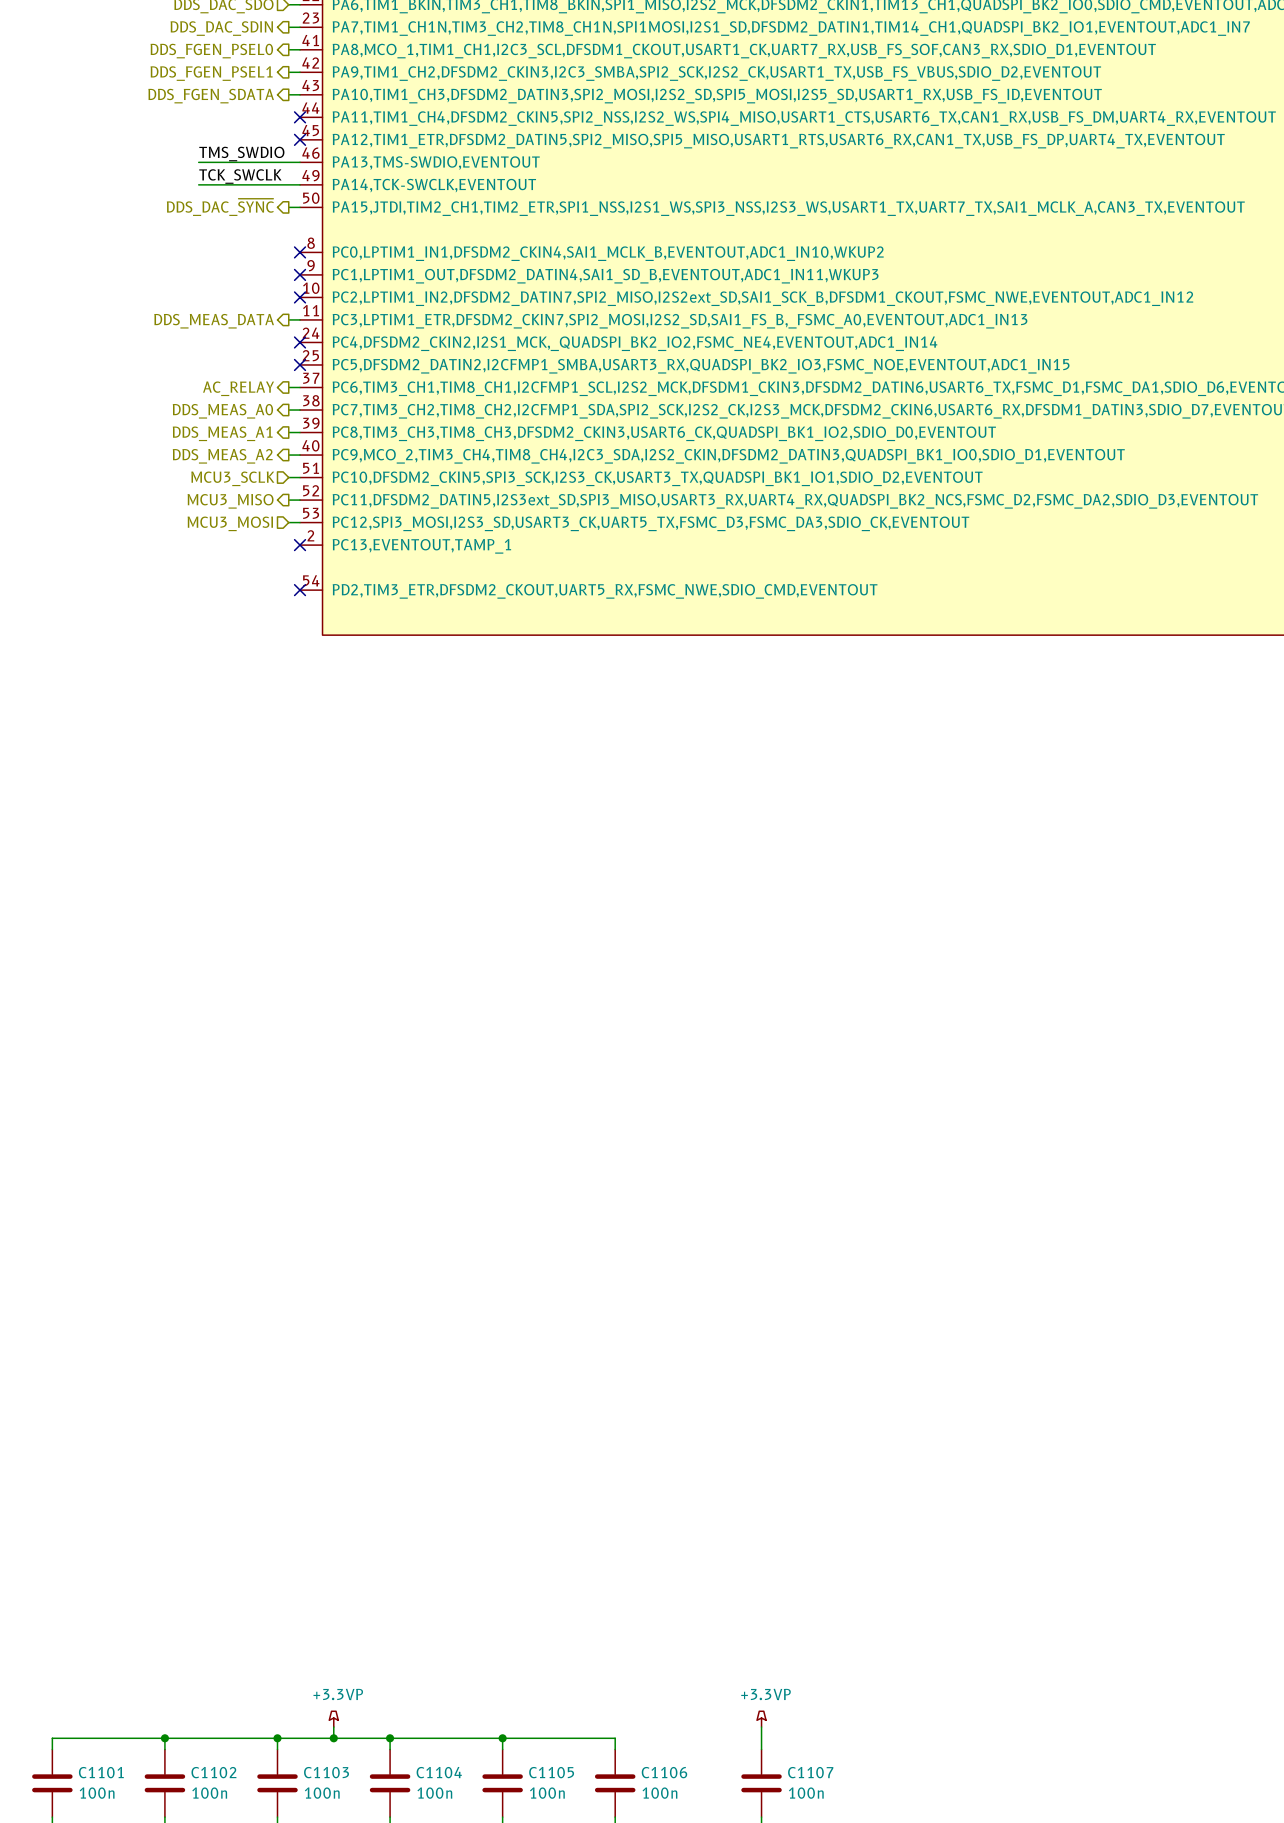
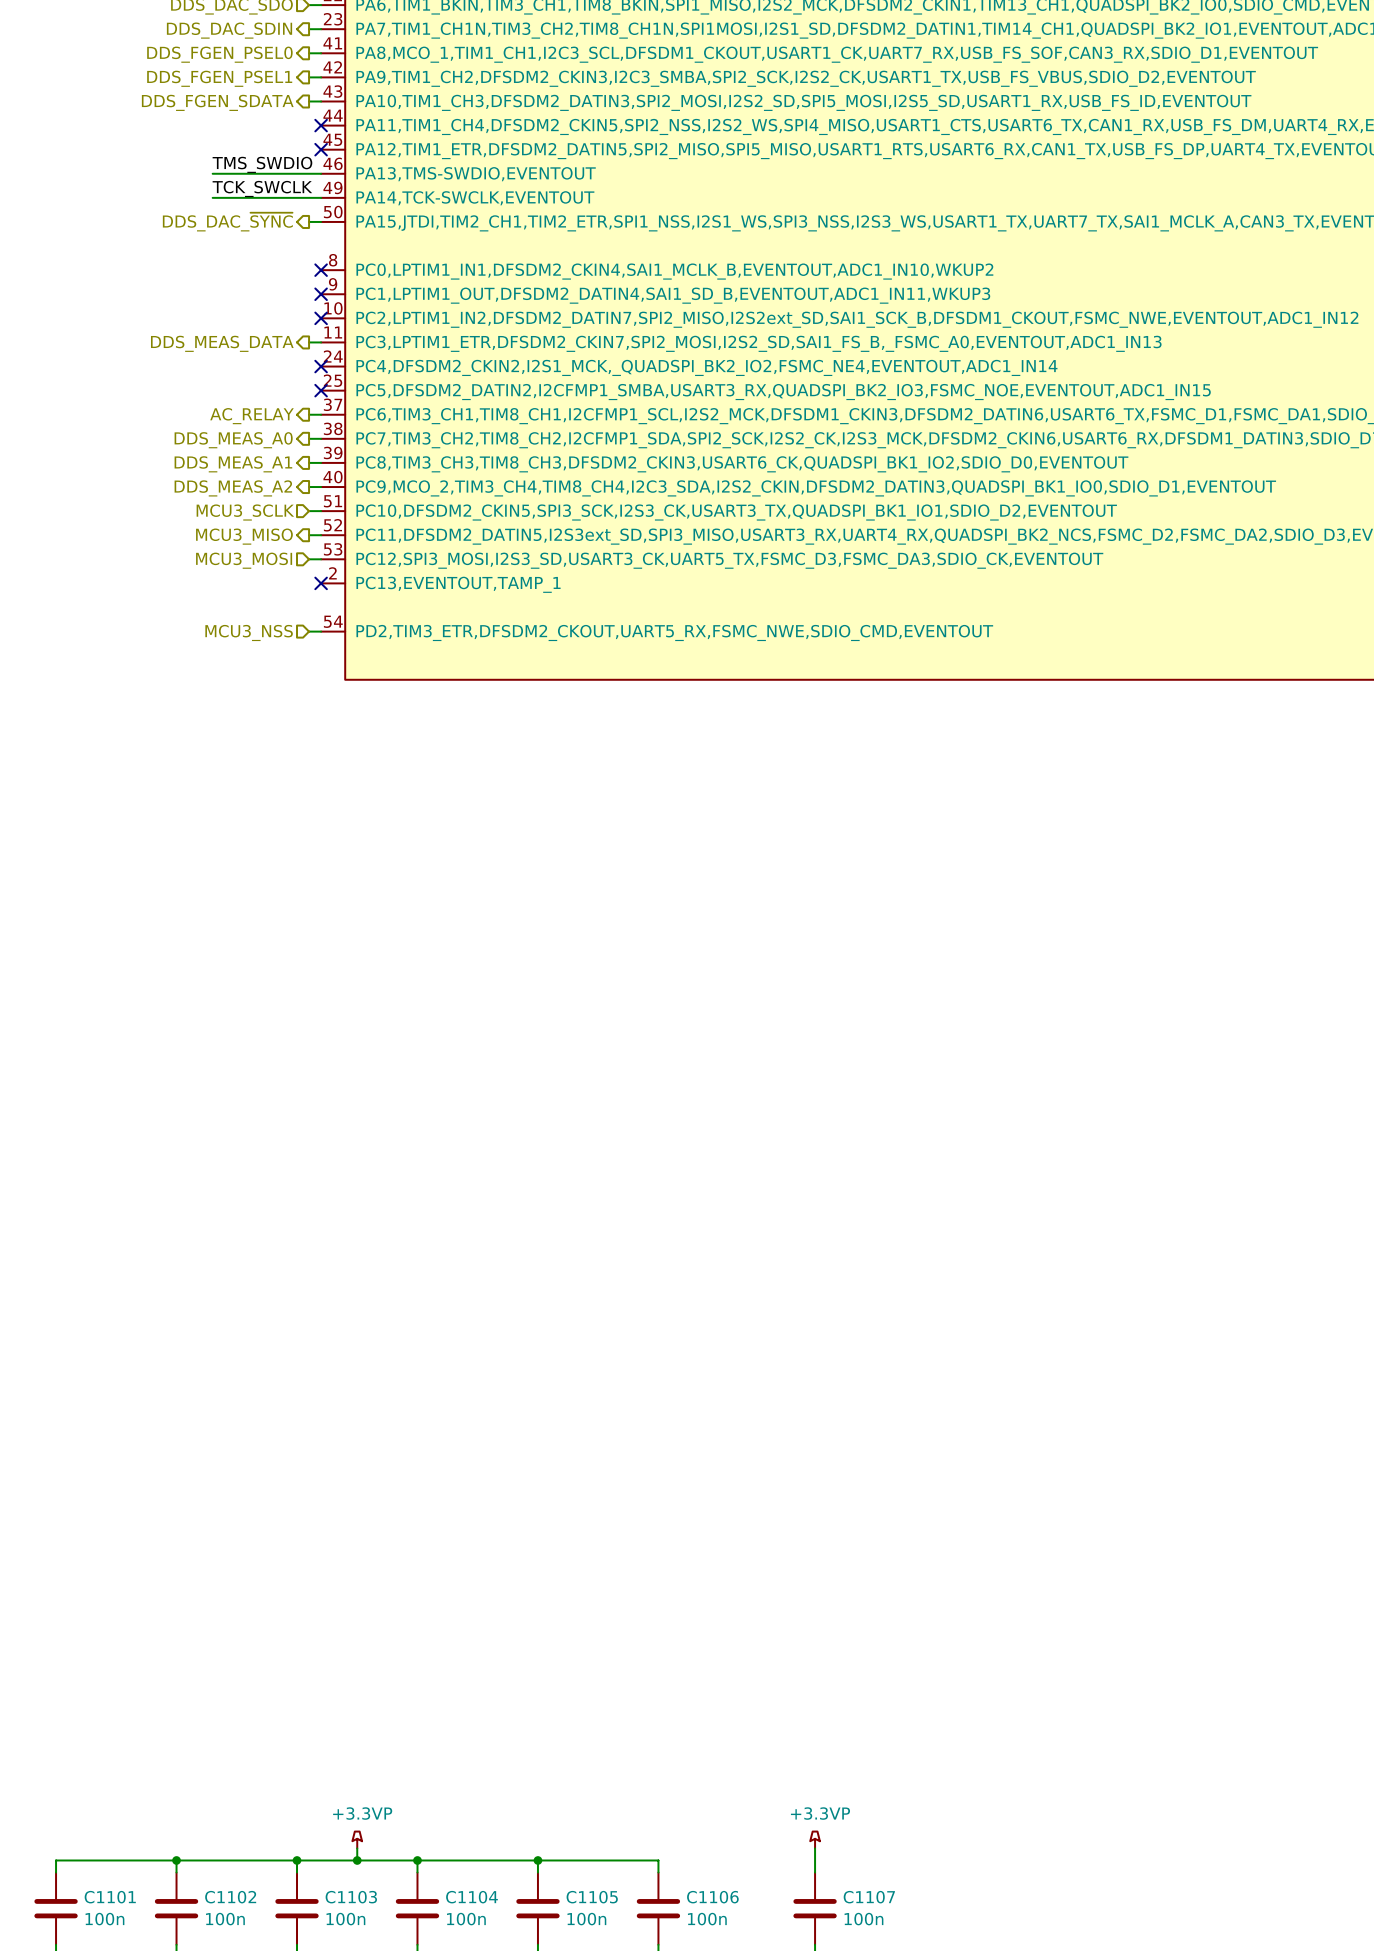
wire: none -> (309, 631) (321, 631)
no-connect mark: (300, 590) -> none
hierarchical label: none -> MCU3_NSS (249, 632)

